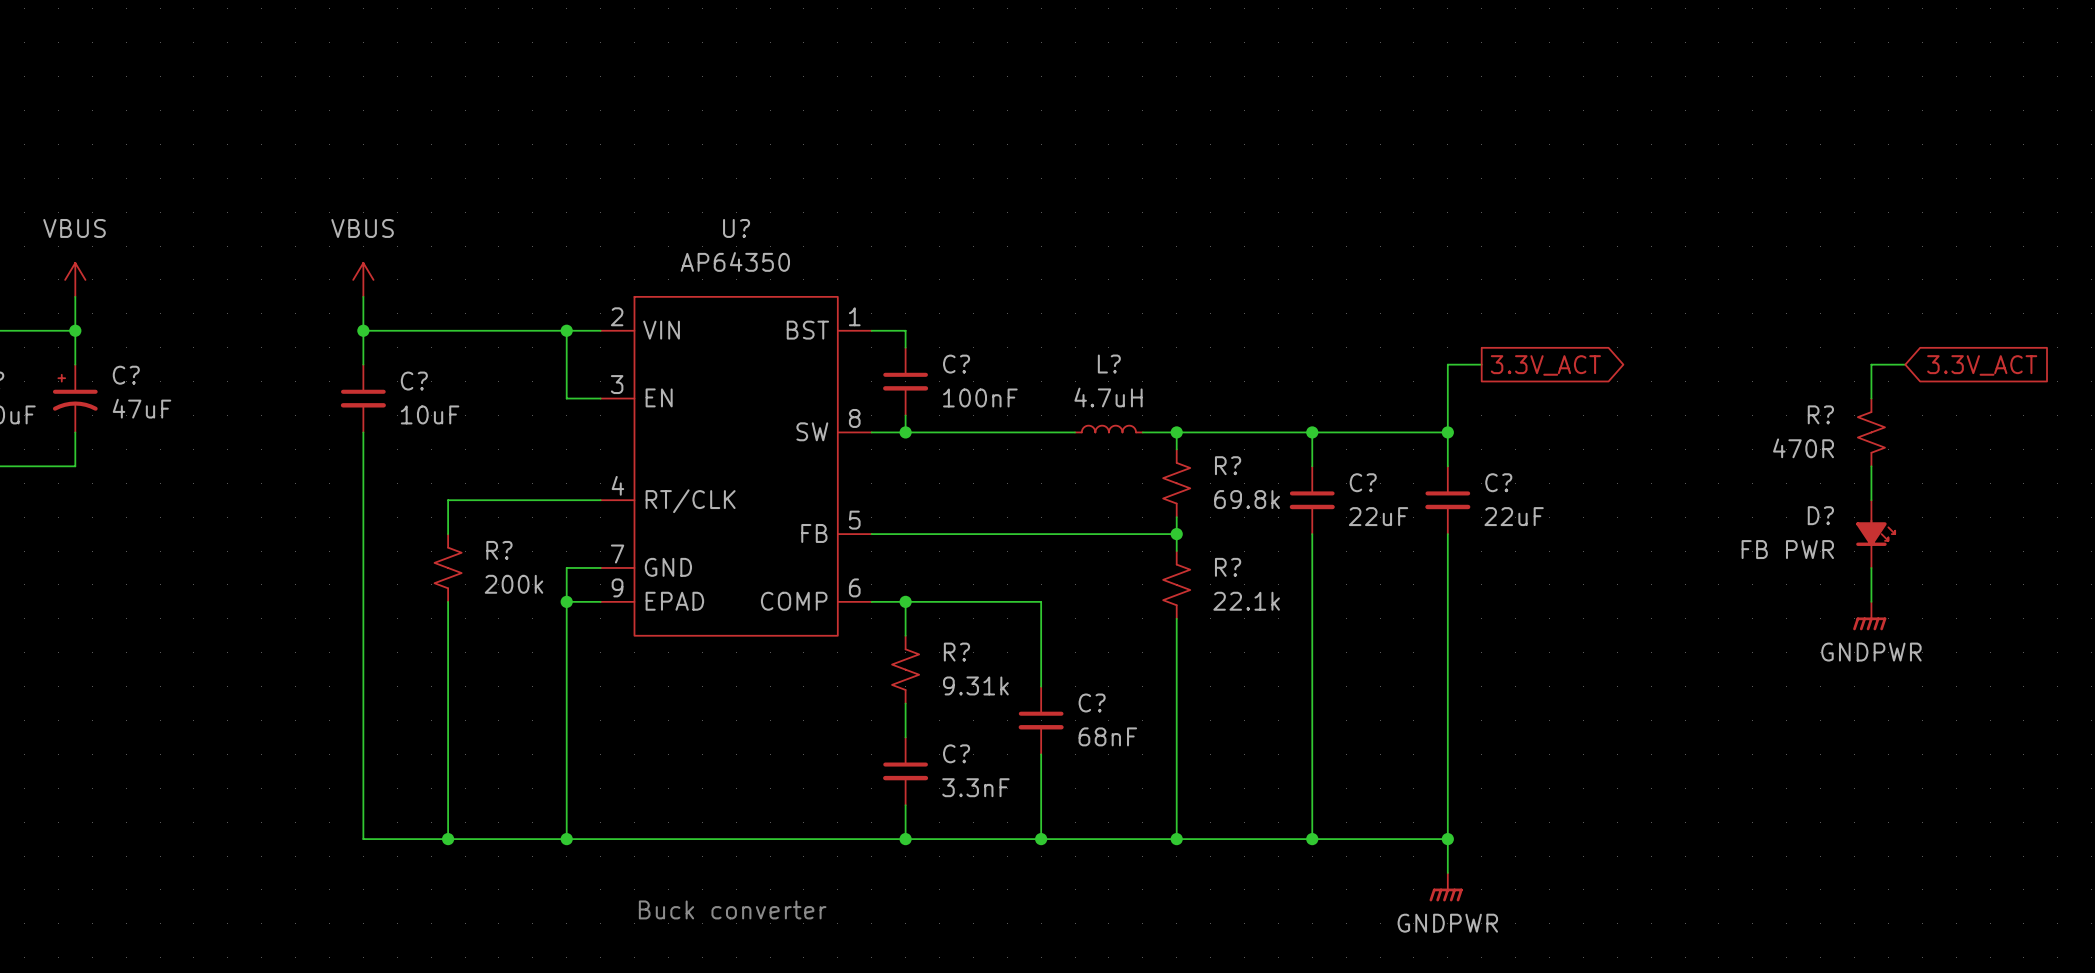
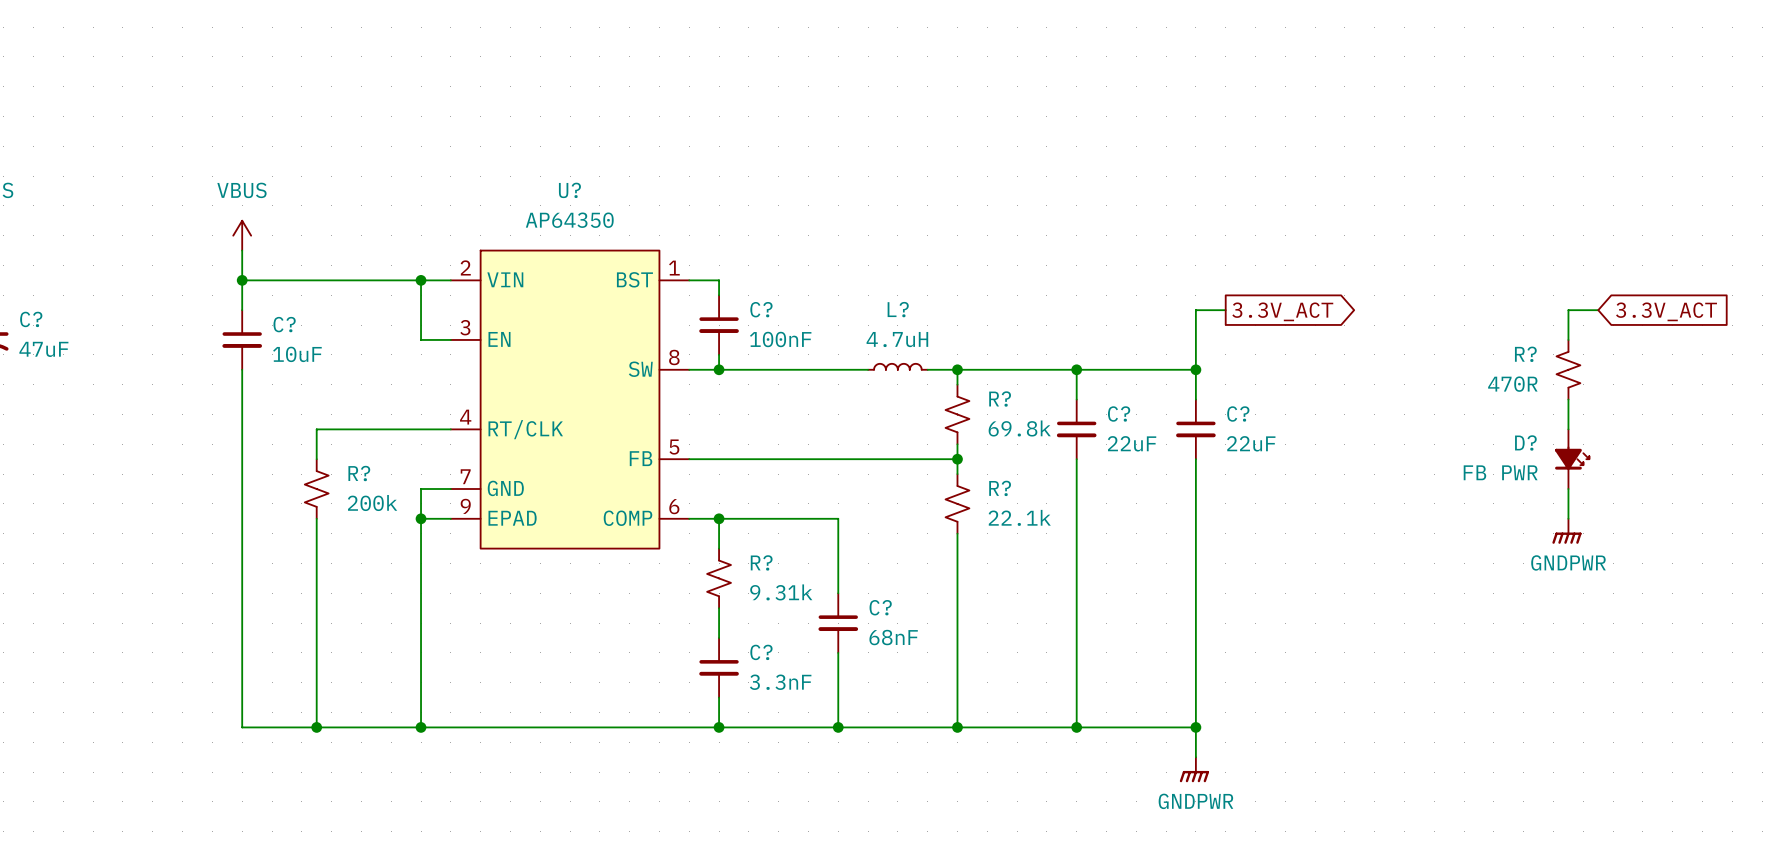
text: Buck converter (732, 909) -> none

